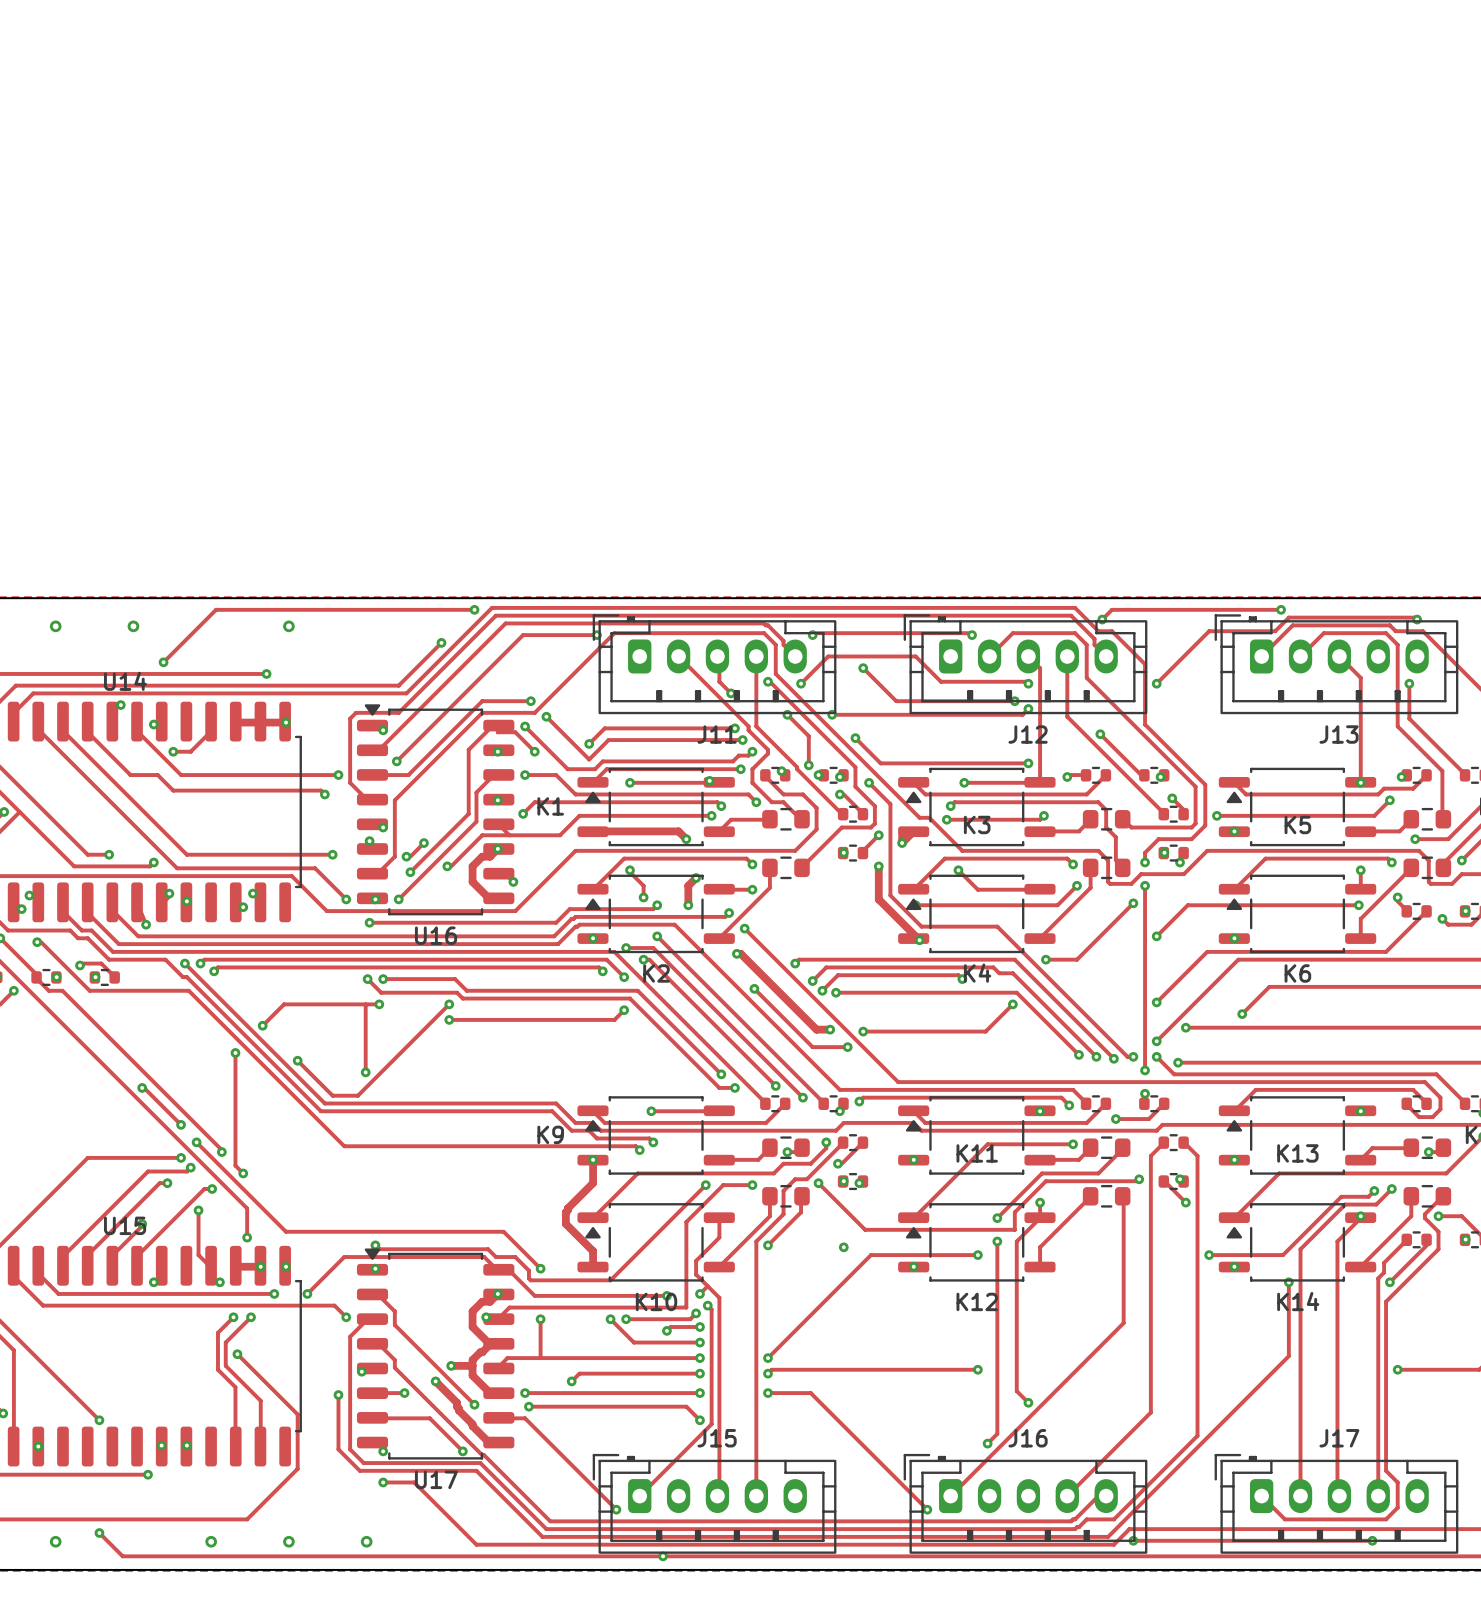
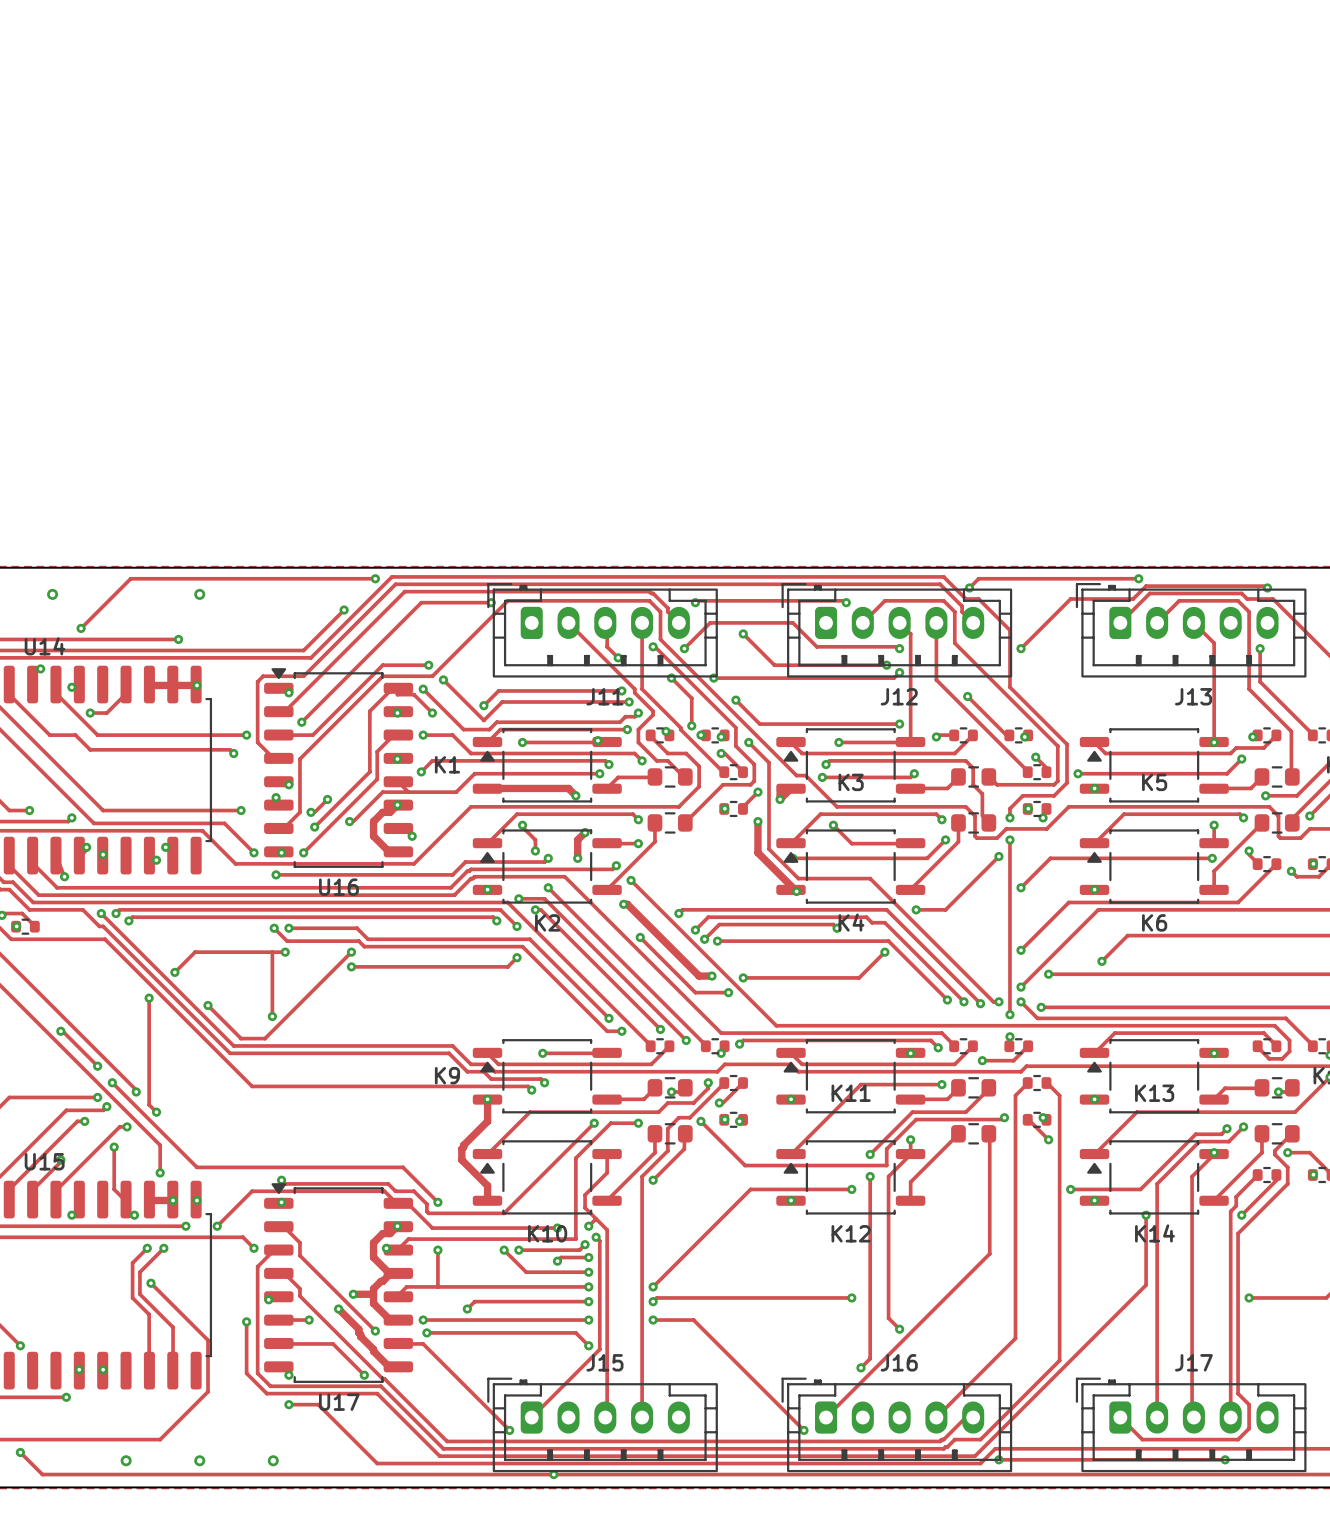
via: (843, 1247) -> none

